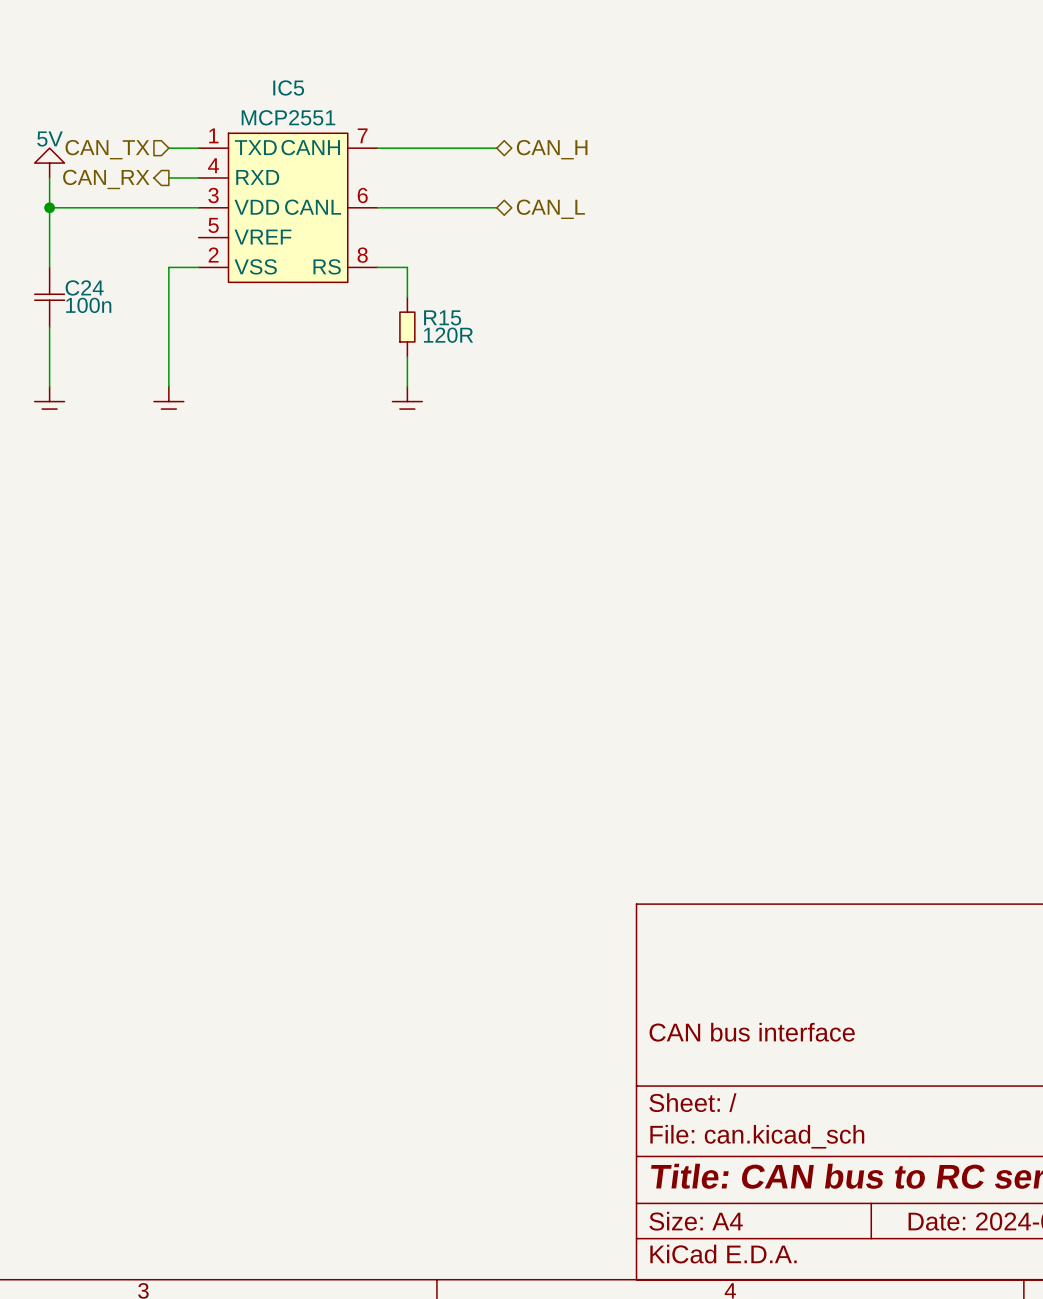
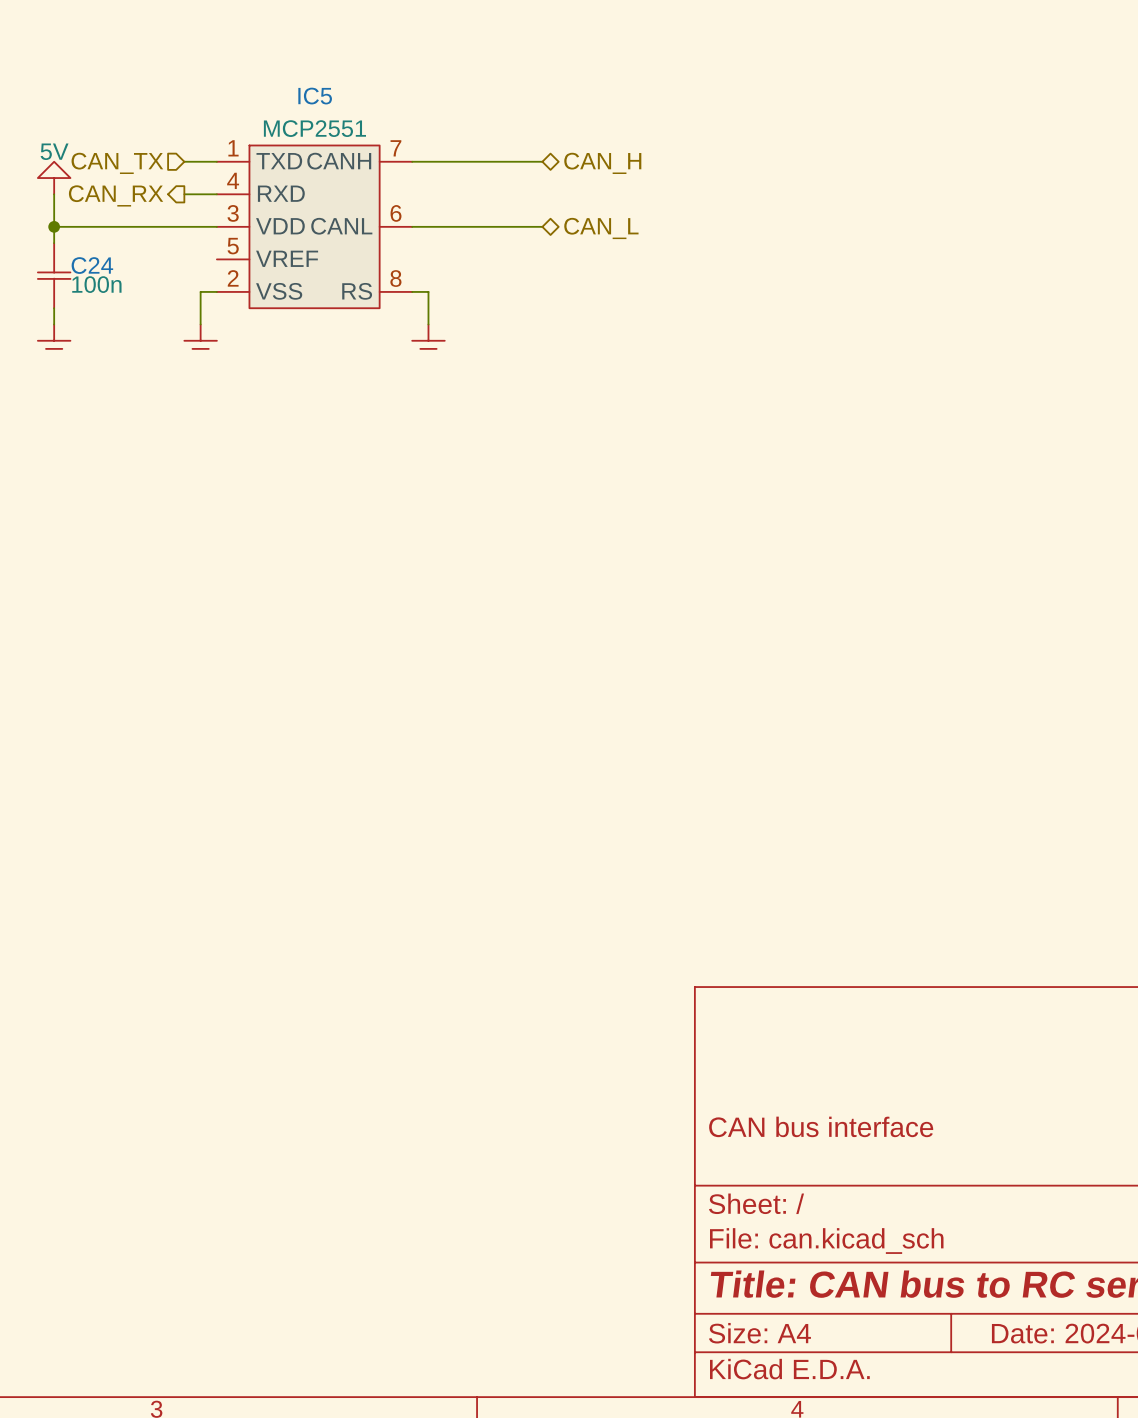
wire: (183, 267) (168, 267) (168, 386) -> (200, 291) (200, 324)
wire: (392, 267) (407, 267) (407, 297) -> (428, 291) (428, 324)
C24 position: (49, 297) -> (54, 275)
power symbol: none -> (54, 340)
power symbol: none -> (200, 340)
wire: (49, 327) (49, 386) -> none
R15: 120R (407, 327) -> none
wire: (407, 356) (407, 386) -> none
power symbol: (49, 401) -> none
power symbol: (168, 401) -> none
power symbol position: (407, 401) -> (428, 340)

